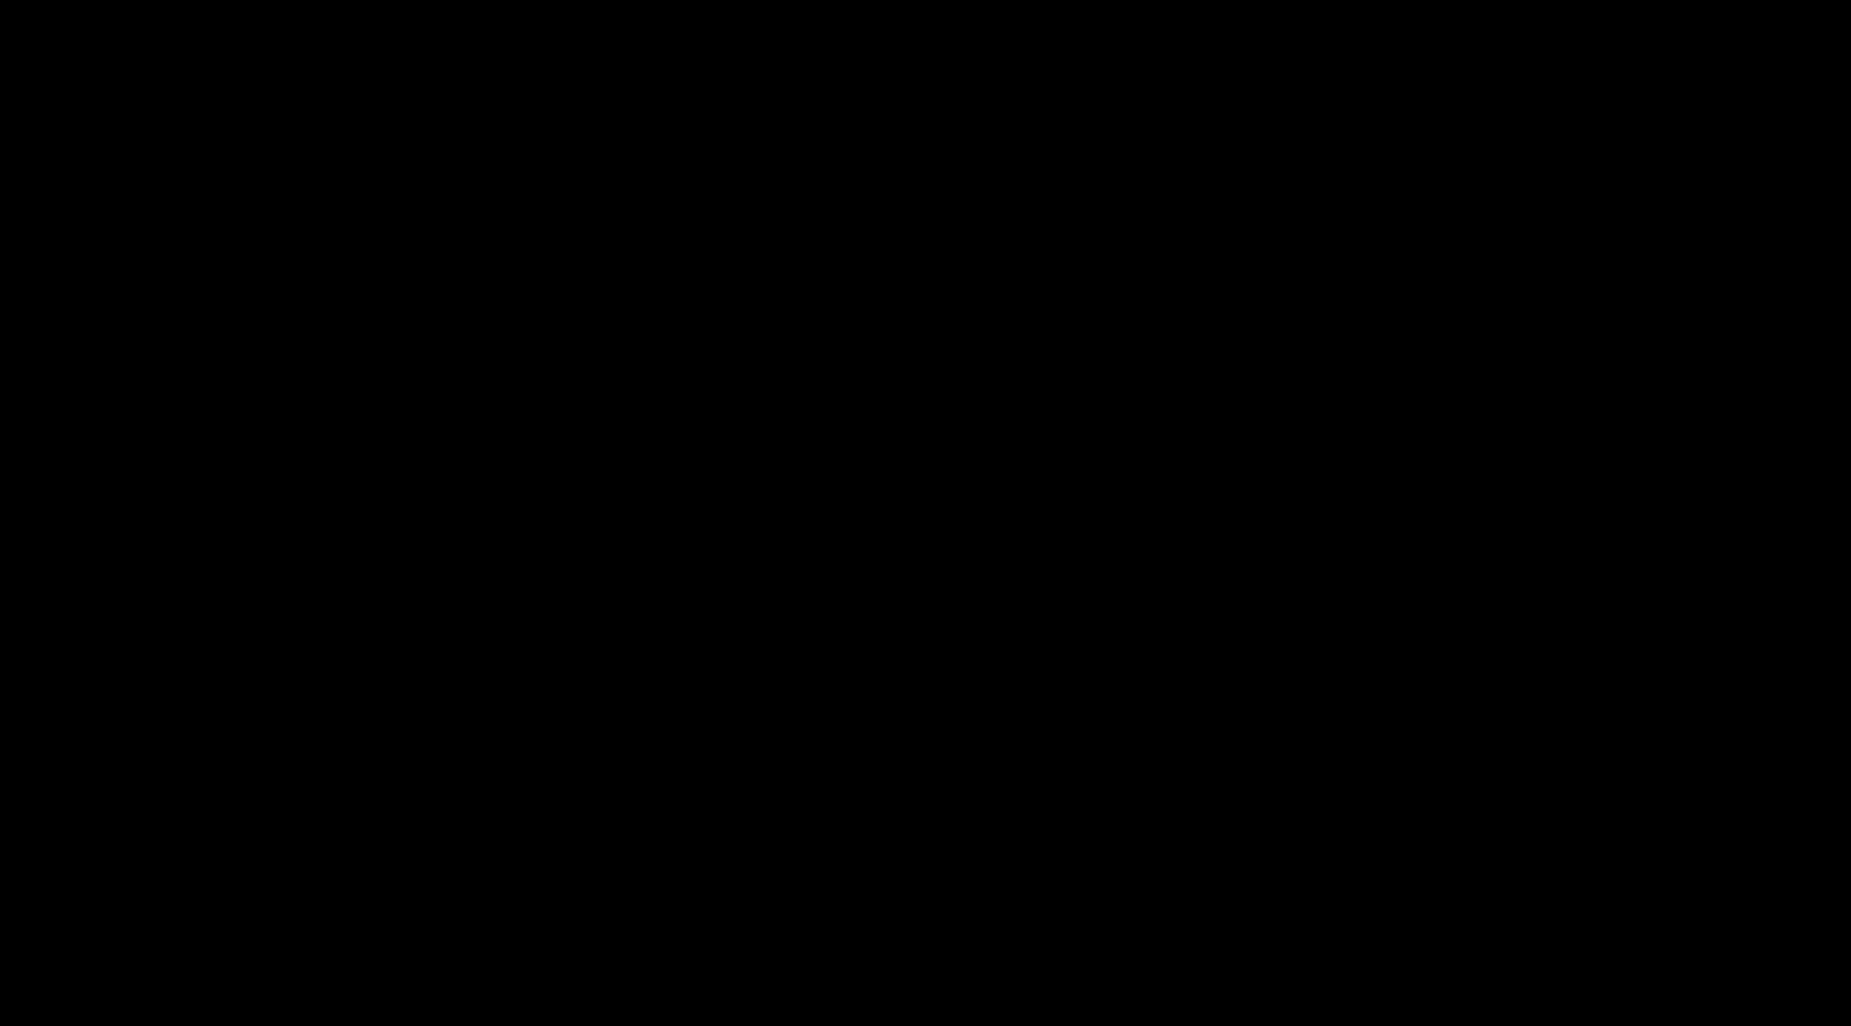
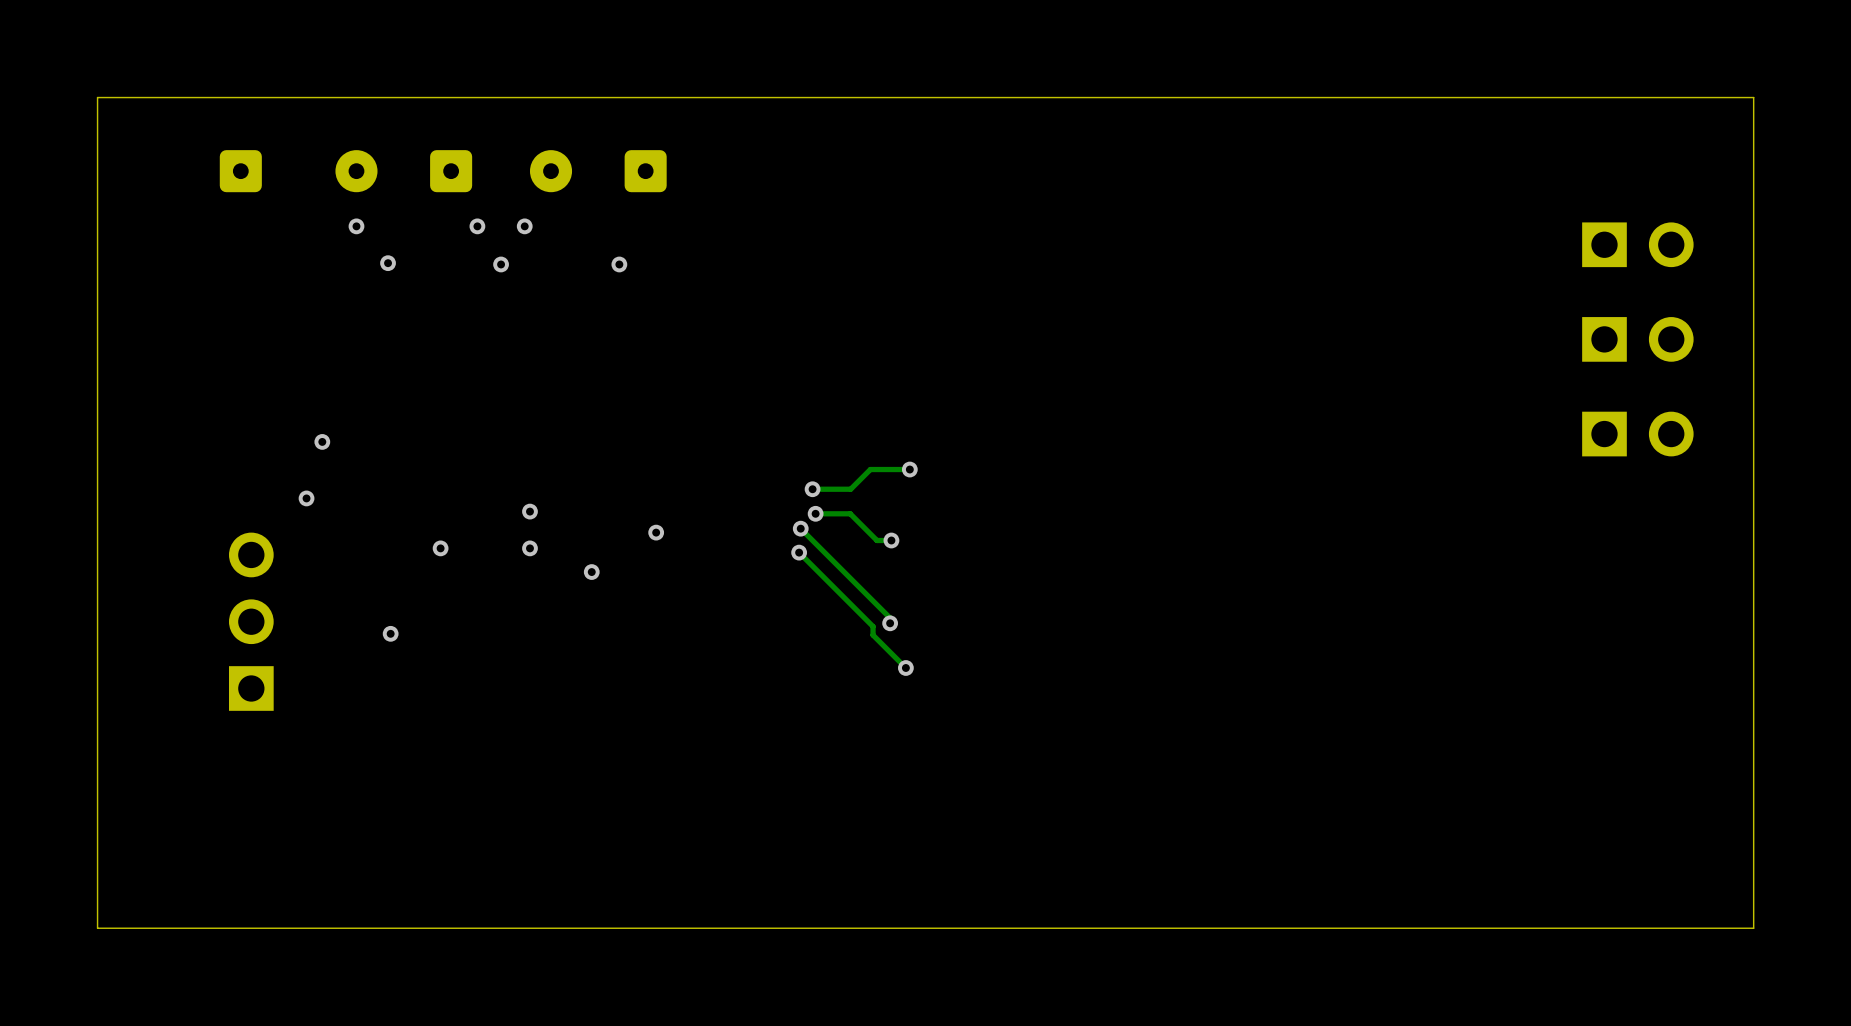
board edge: none -> (1753, 97) (97, 97) (97, 928) (1753, 928) (1753, 97)
part: none -> (240, 171)
part: none -> (403, 171)
part: none -> (598, 171)
via: none -> (356, 226)
via: none -> (477, 226)
via: none -> (524, 226)
part: none -> (1637, 244)
via: none -> (388, 263)
via: none -> (501, 264)
via: none -> (619, 264)
part: none -> (1637, 339)
part: none -> (1637, 434)
via: none -> (322, 441)
track: none -> (909, 469) (870, 469) (850, 489) (812, 489)
via: none -> (909, 469)
via: none -> (812, 489)
via: none -> (306, 498)
via: none -> (529, 511)
track: none -> (815, 513) (850, 513) (876, 540) (891, 540)
via: none -> (815, 513)
track: none -> (800, 528) (890, 618) (890, 623)
via: none -> (800, 528)
via: none -> (656, 532)
via: none -> (891, 540)
via: none -> (440, 548)
via: none -> (529, 548)
track: none -> (799, 552) (873, 626) (873, 635) (905, 667)
via: none -> (799, 552)
via: none -> (591, 572)
part: none -> (251, 621)
via: none -> (890, 623)
via: none -> (390, 633)
via: none -> (905, 667)

